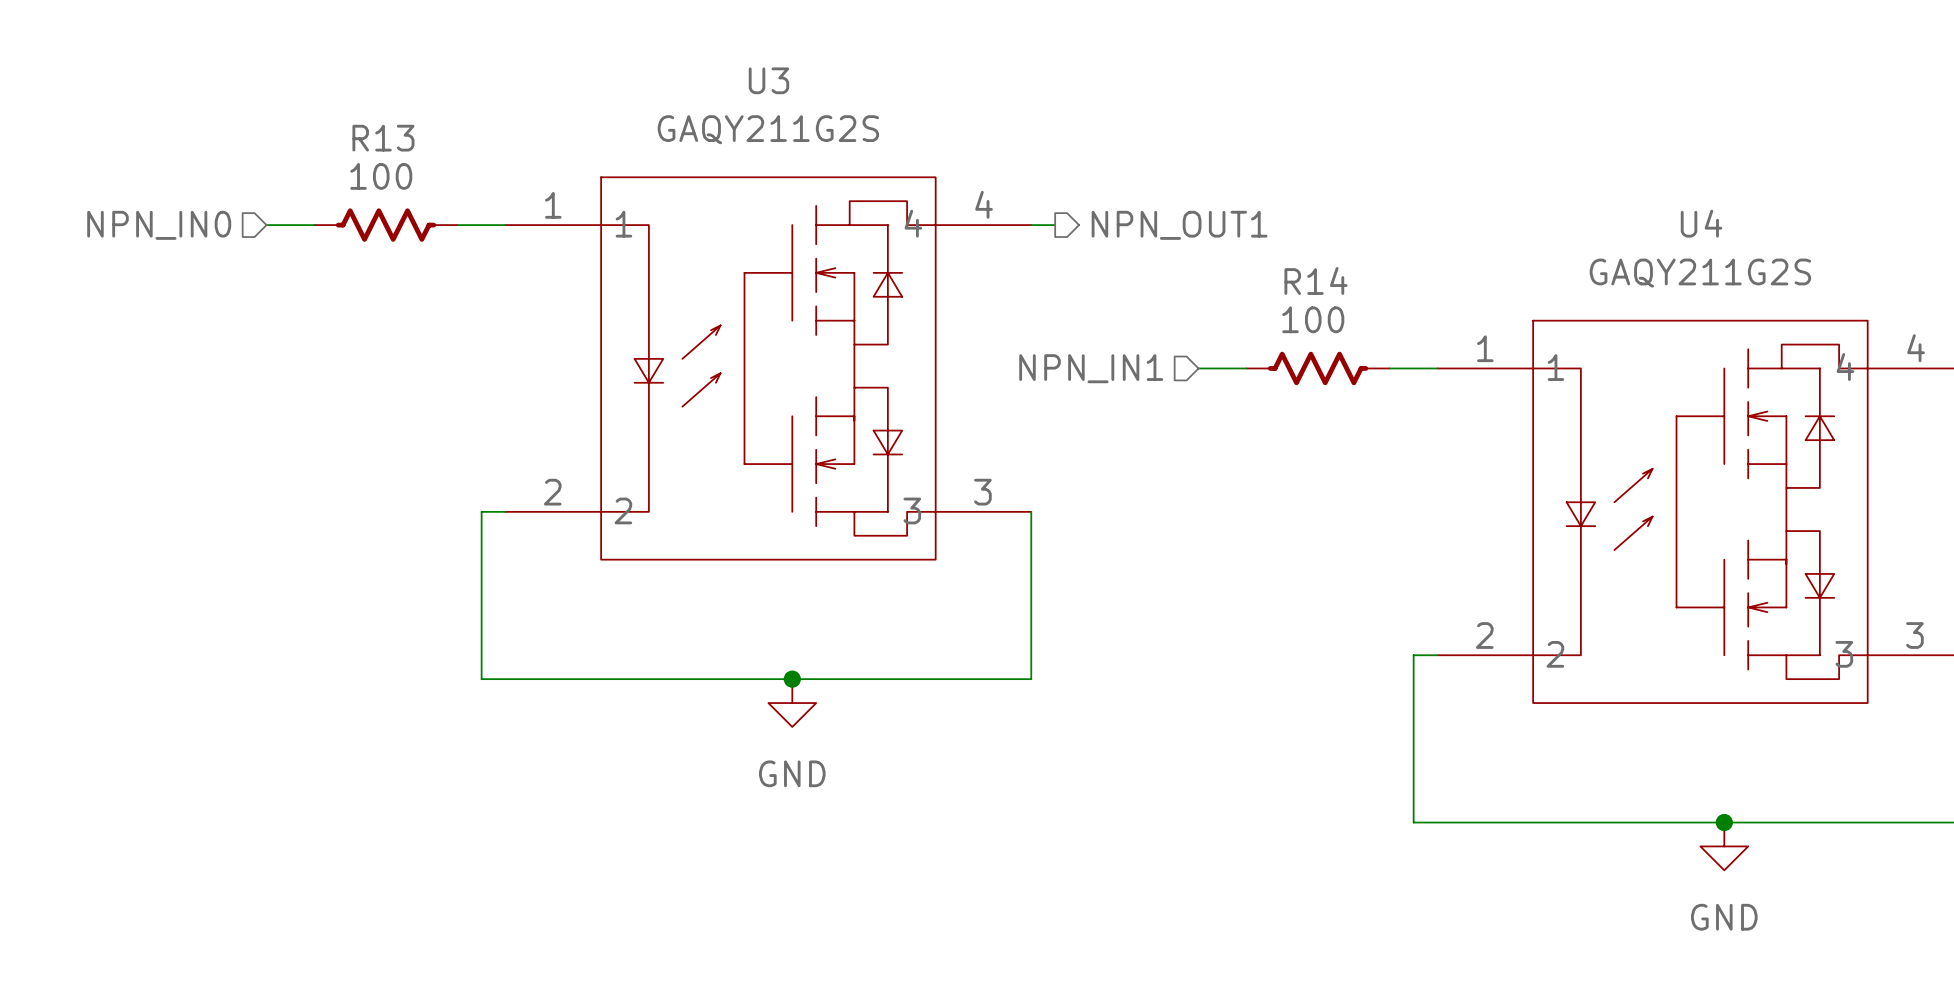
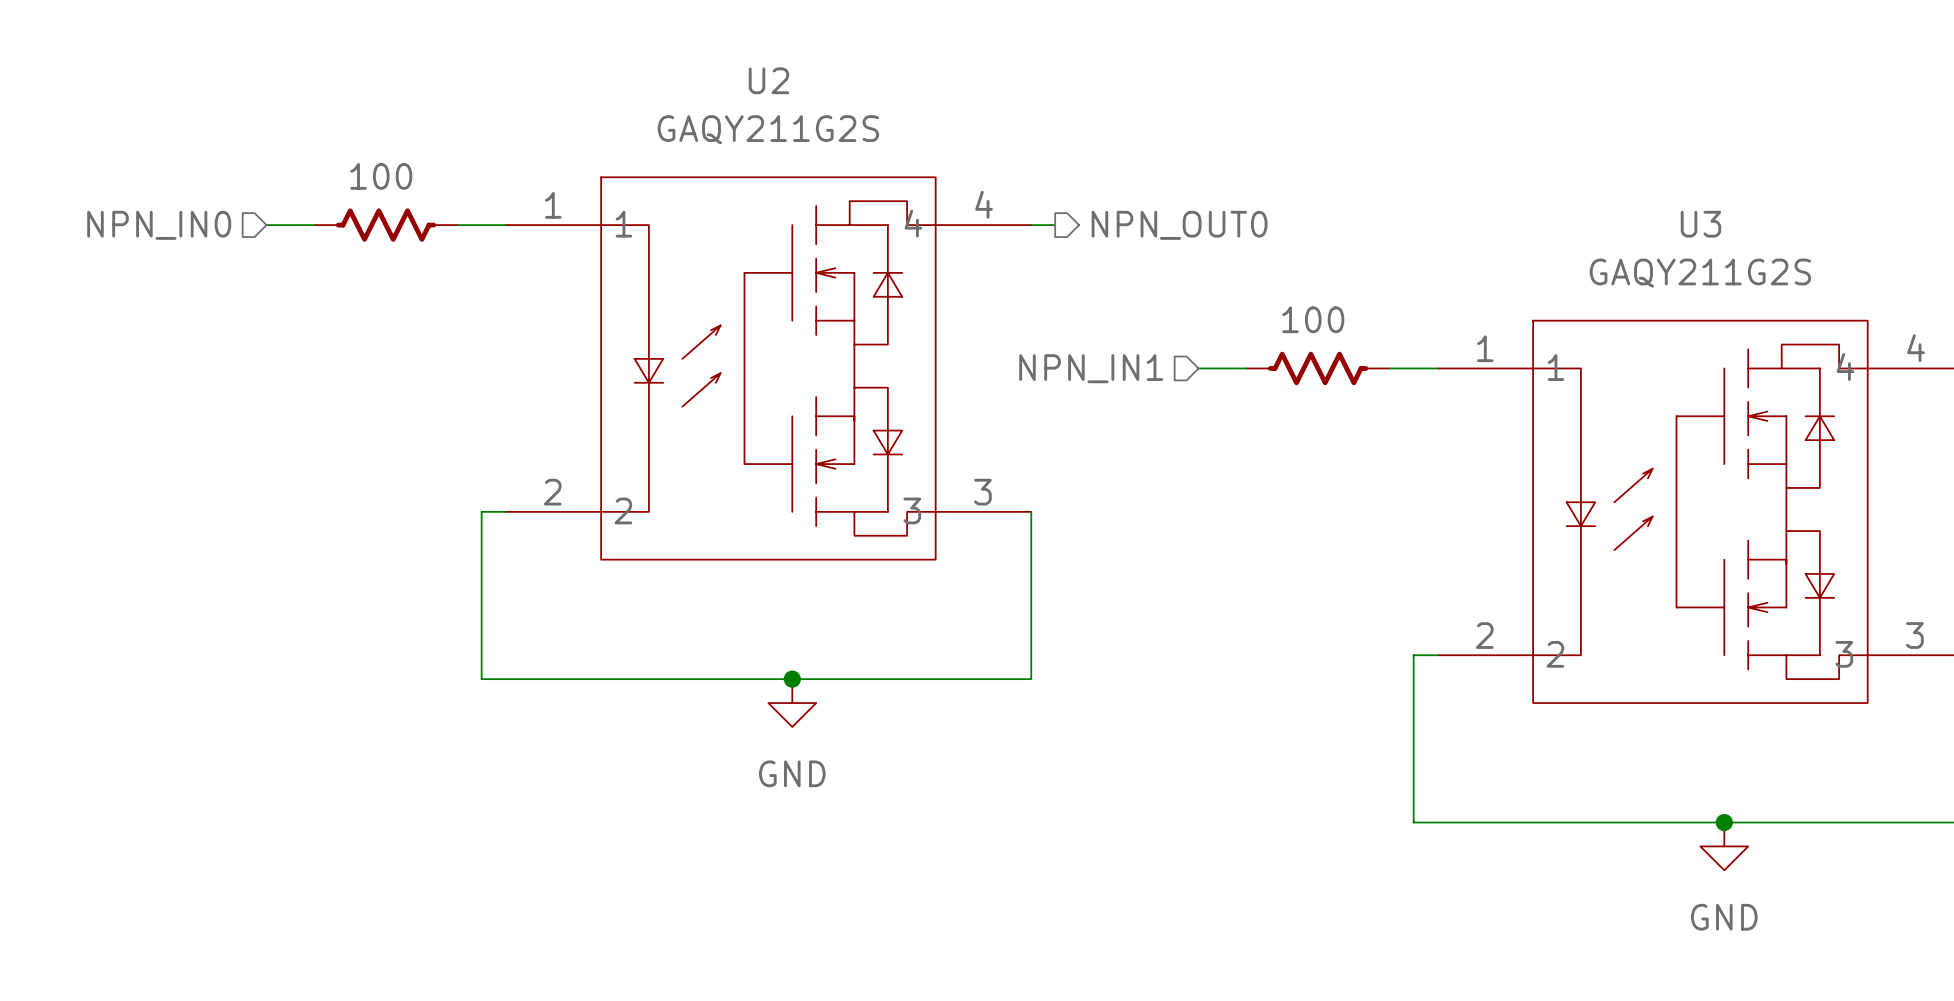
U3 name: U3 (768, 80) -> U2 (768, 80)
R13 name: R13 (383, 138) -> none
U4 name: U4 (1701, 223) -> U3 (1700, 224)
hierarchical label: NPN_OUT1 (1179, 225) -> NPN_OUT0 (1179, 225)
R14 name: R14 (1316, 280) -> none

